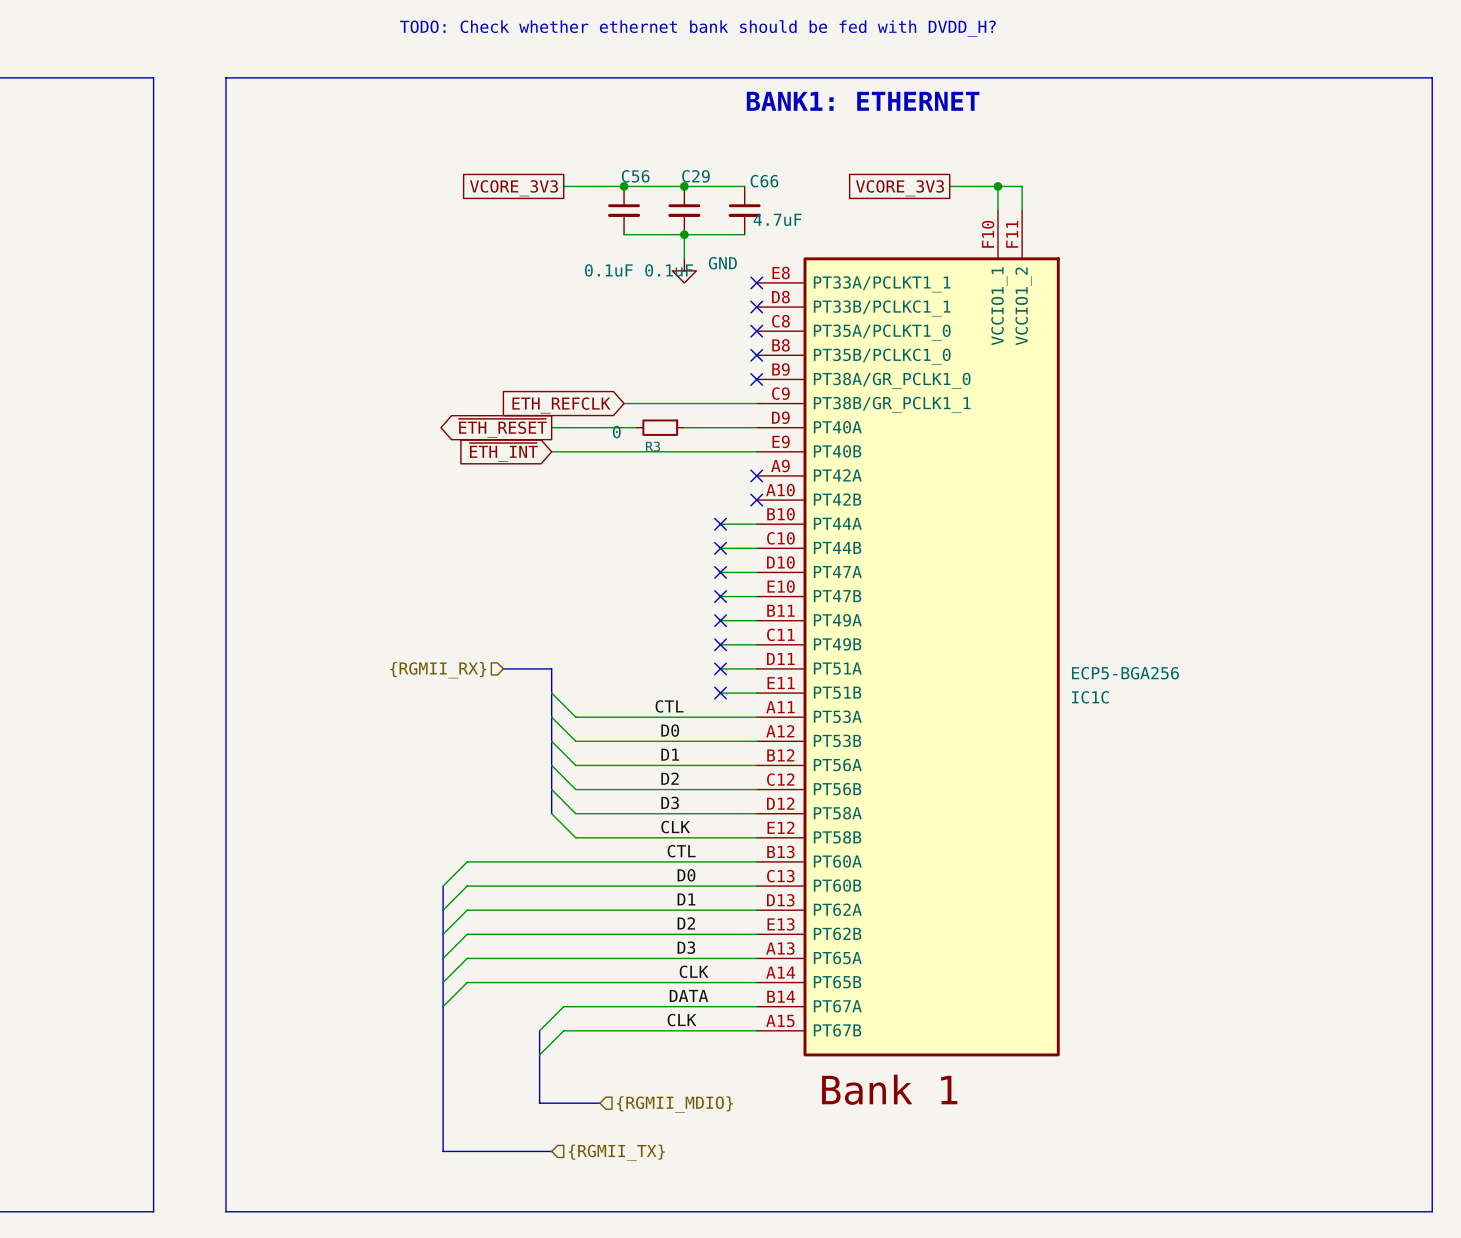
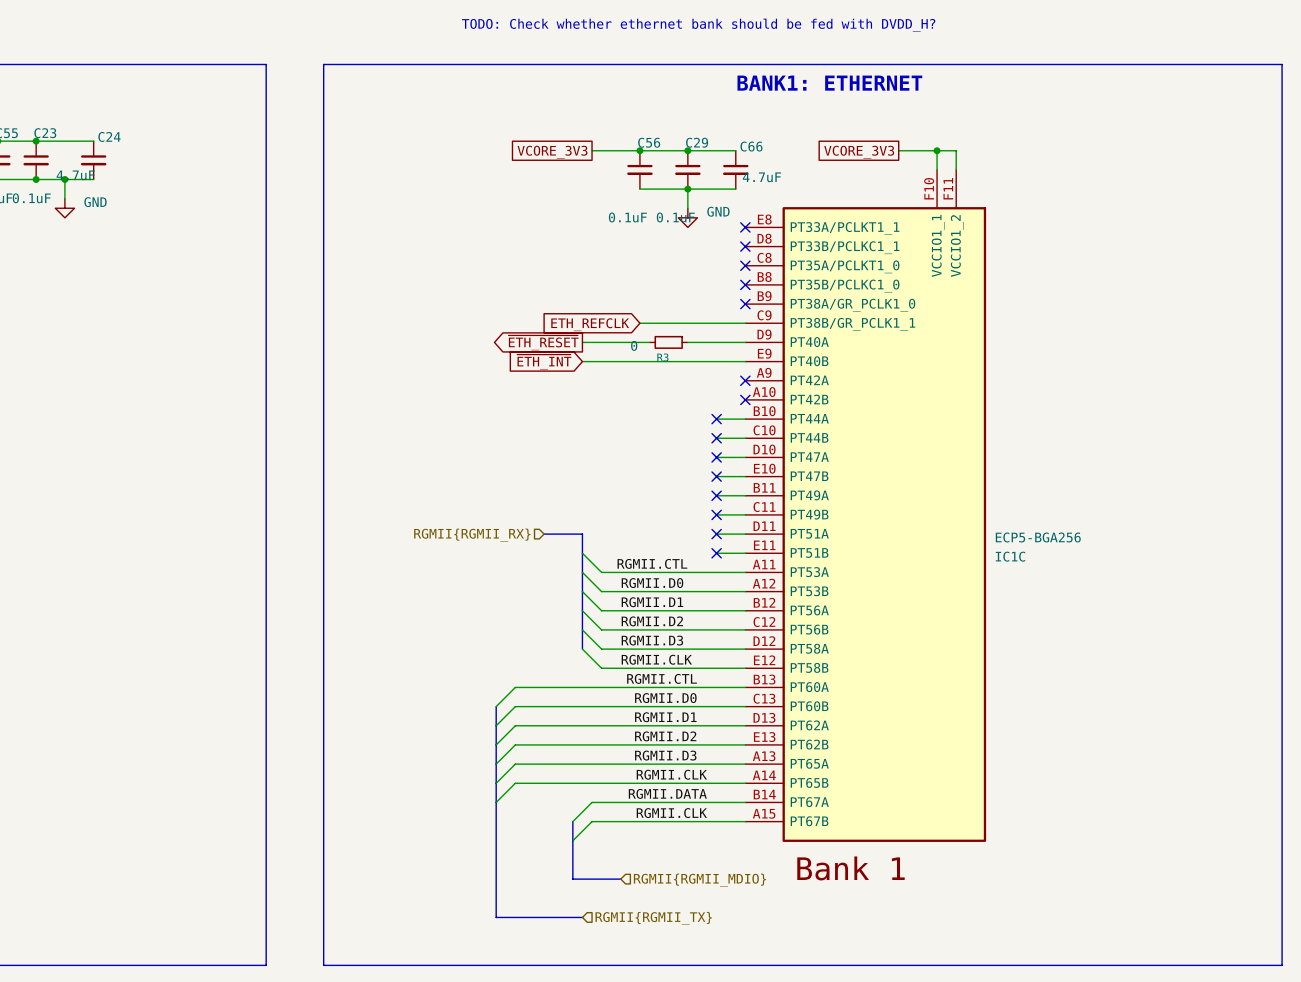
hierarchical label: {RGMII_RX} (438, 670) -> RGMII{RGMII_RX} (472, 535)
label: CTL (669, 706) -> RGMII.CTL (652, 563)
label: none -> RGMII.D0 (652, 583)
label: D0 (670, 730) -> none
label: none -> RGMII.D1 (652, 602)
label: D1 (670, 754) -> none
label: none -> RGMII.D2 (652, 621)
label: D2 (670, 778) -> none
label: none -> RGMII.D3 (652, 640)
label: D3 (670, 802) -> none
label: none -> RGMII.CLK (656, 659)
label: CLK (675, 827) -> none
label: CTL (681, 851) -> RGMII.CTL (661, 678)
label: D0 (686, 875) -> RGMII.D0 (665, 698)
label: D1 (686, 899) -> RGMII.D1 (665, 717)
label: D2 (686, 923) -> RGMII.D2 (665, 736)
label: D3 (686, 947) -> RGMII.D3 (665, 755)
label: CLK (694, 971) -> RGMII.CLK (671, 774)
label: DATA (688, 995) -> RGMII.DATA (667, 793)
label: none -> RGMII.CLK (671, 813)
label: CLK (682, 1020) -> none
hierarchical label: {RGMII_MDIO} (675, 1104) -> RGMII{RGMII_MDIO} (699, 880)
hierarchical label: {RGMII_TX} (616, 1152) -> RGMII{RGMII_TX} (653, 918)

